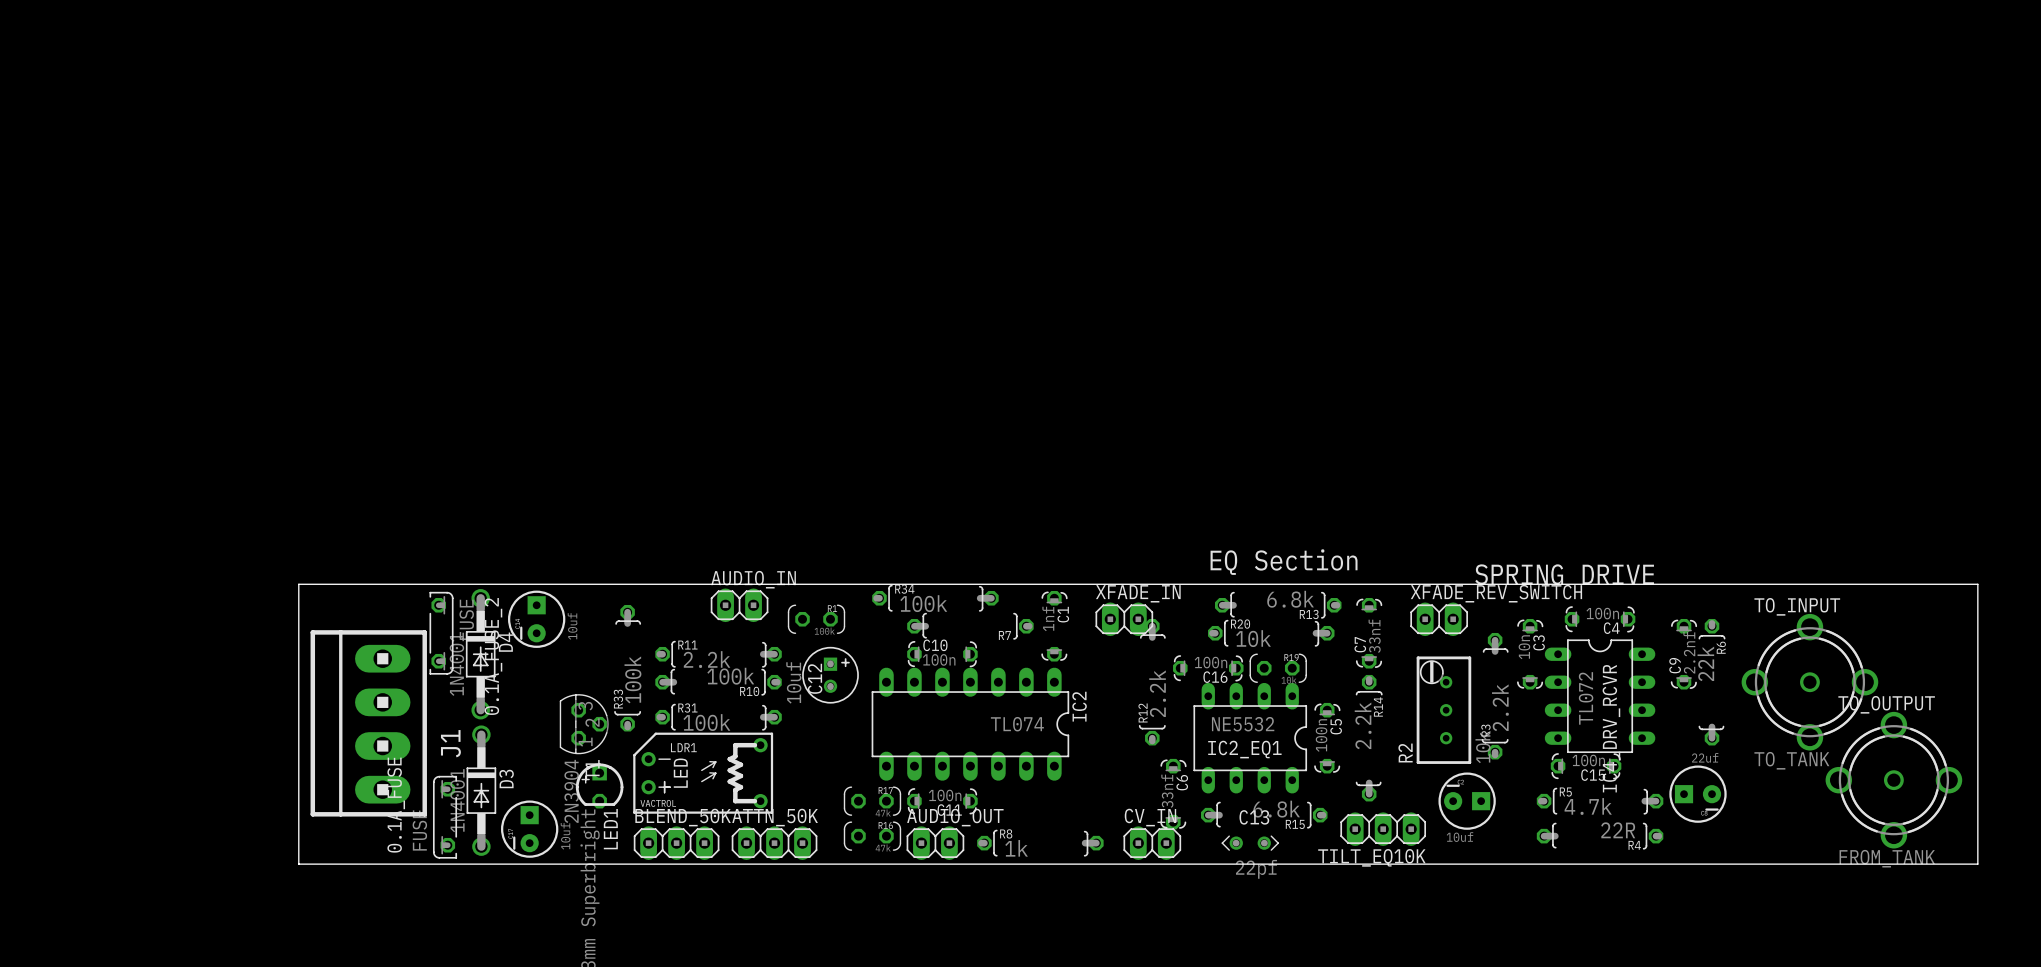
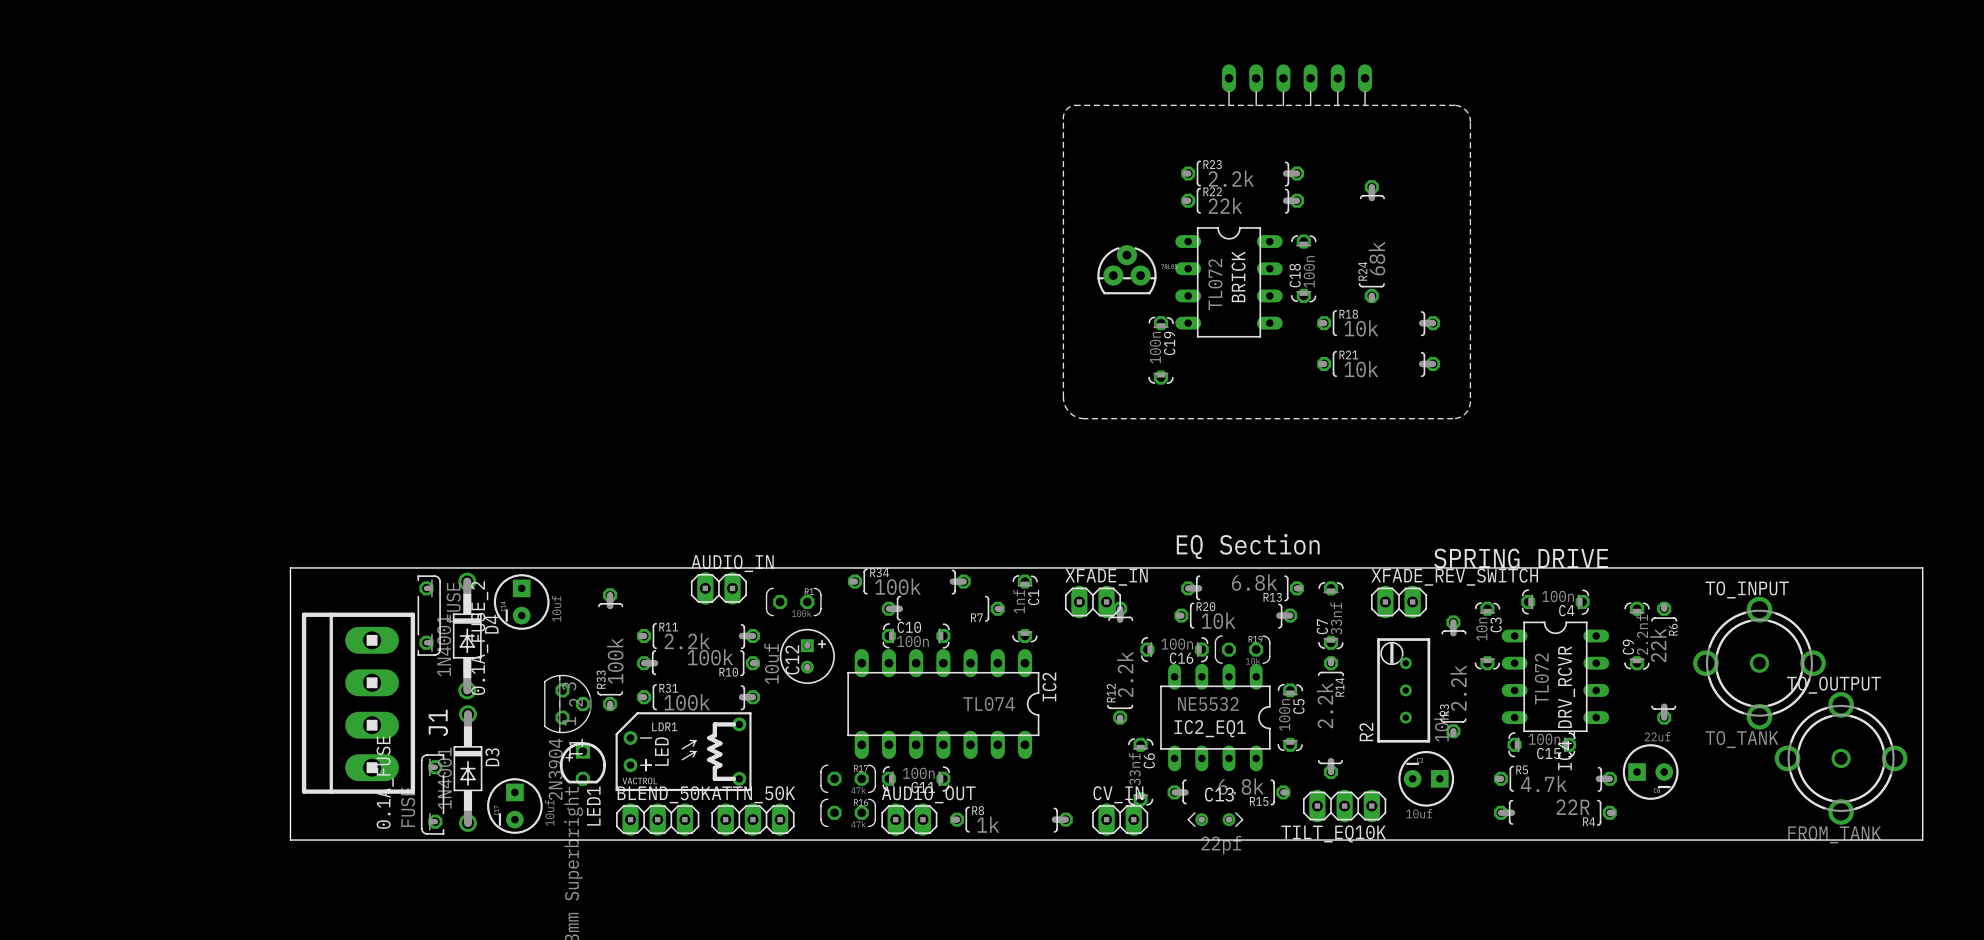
R23: none -> 2.2k (1242, 173)
R22: none -> 22k (1242, 200)
part: none -> (1266, 241)
R24: none -> 68k (1371, 241)
C18: none -> 100n (1303, 268)
part: none -> (1126, 269)
BRICK: none -> TL072 (1229, 282)
R18: none -> 10k (1378, 323)
C19: none -> 100n (1161, 350)
R21: none -> 10k (1378, 363)

